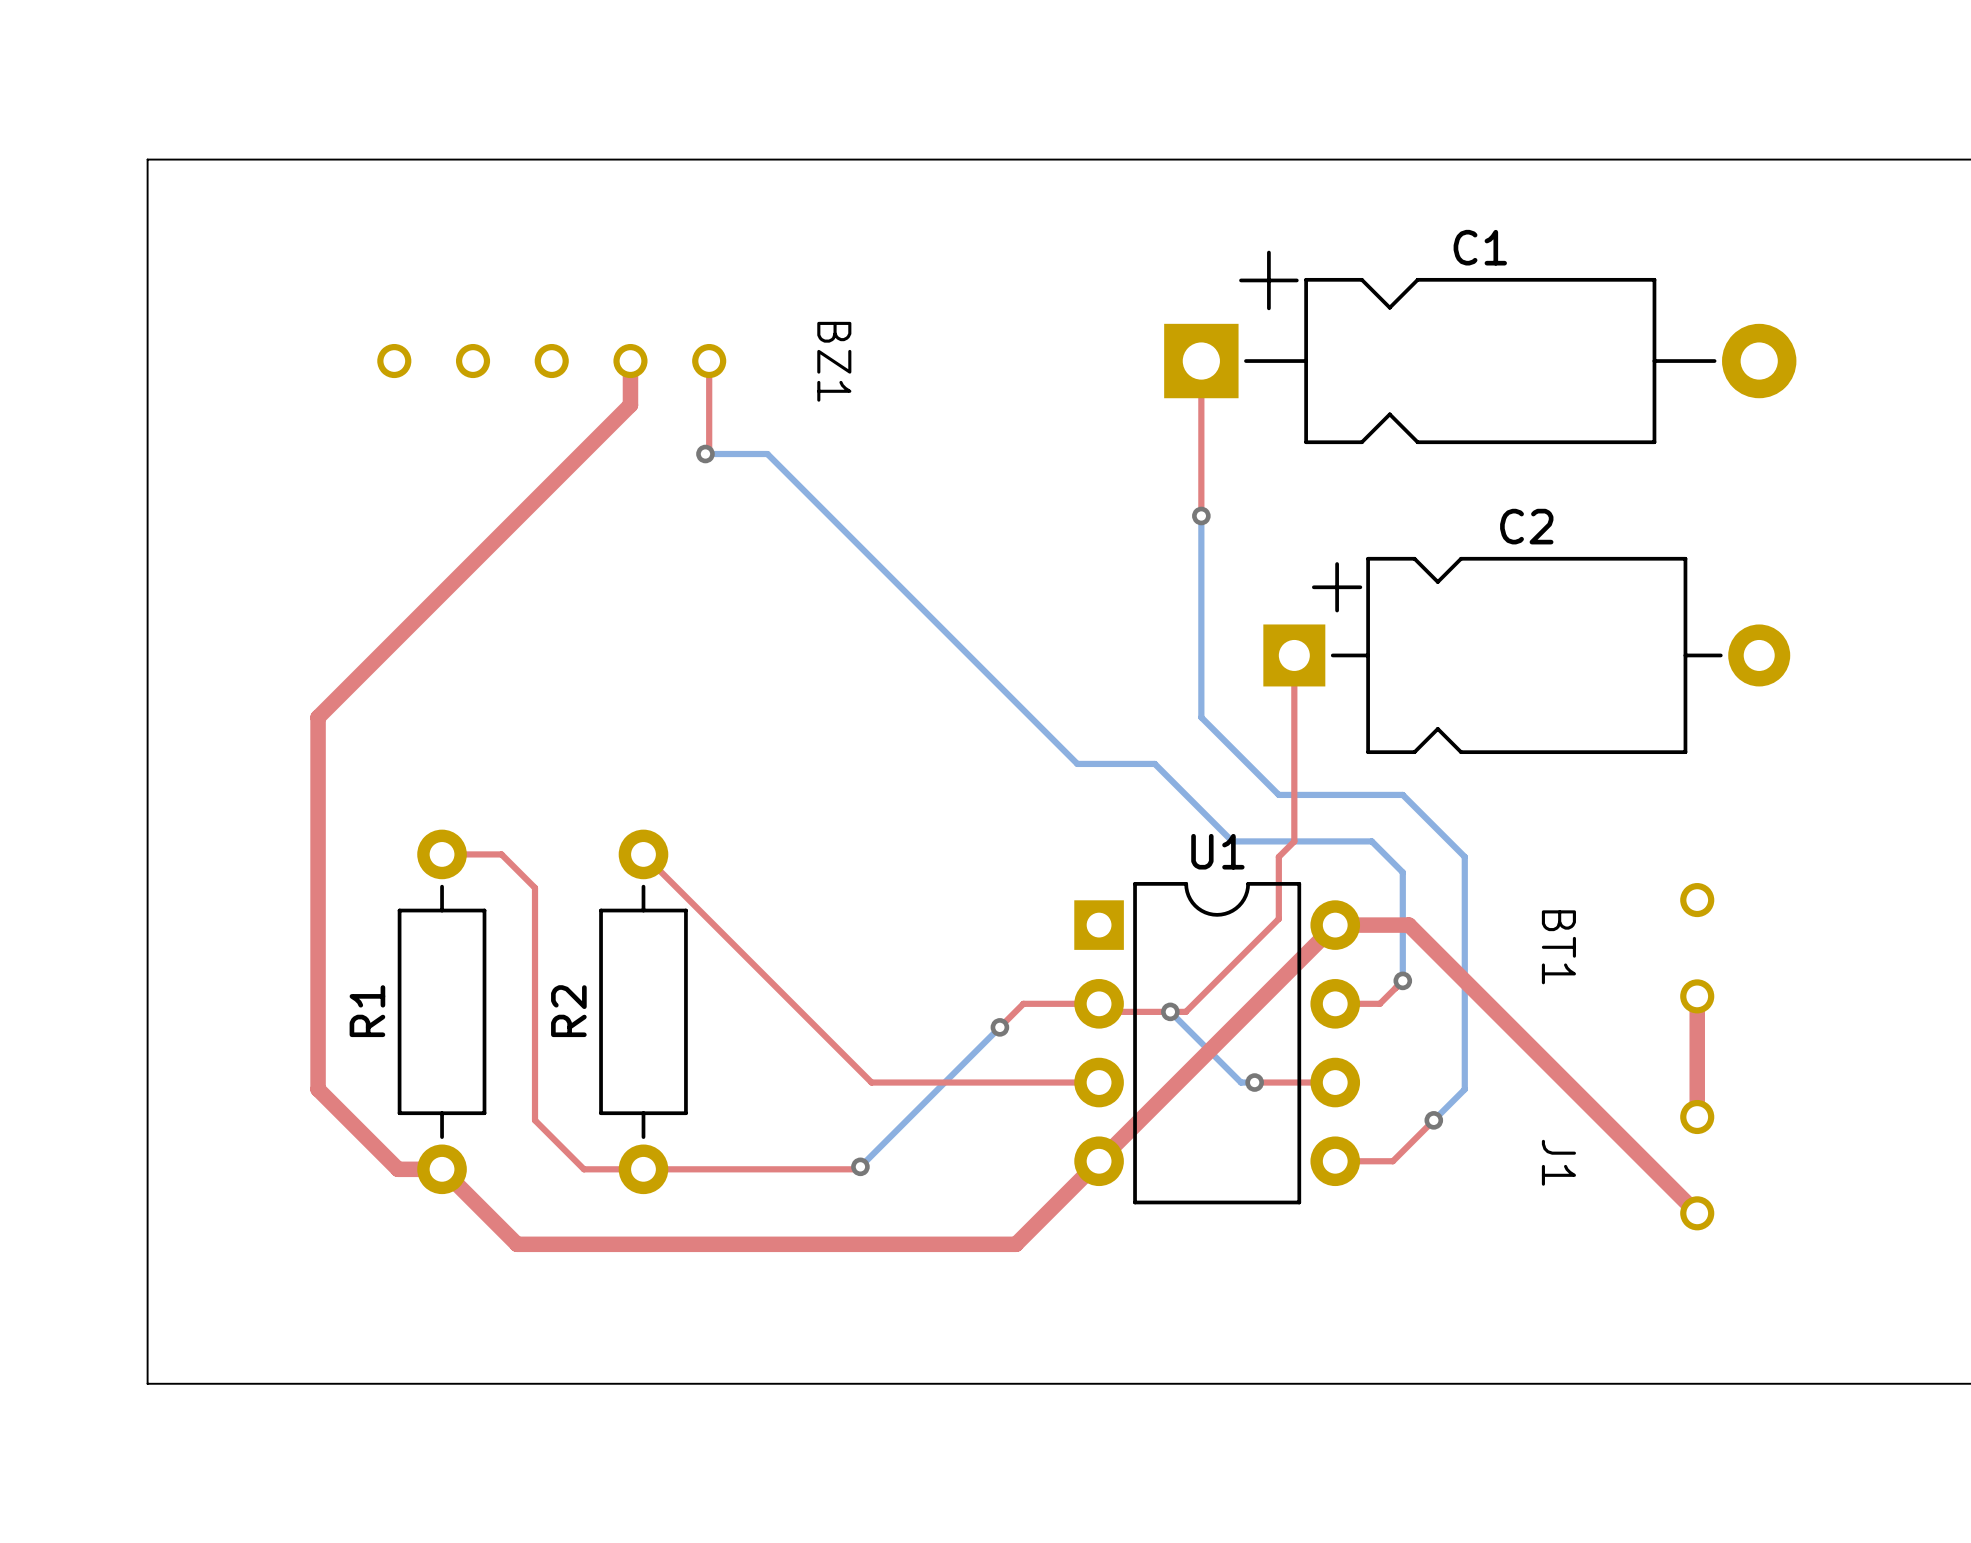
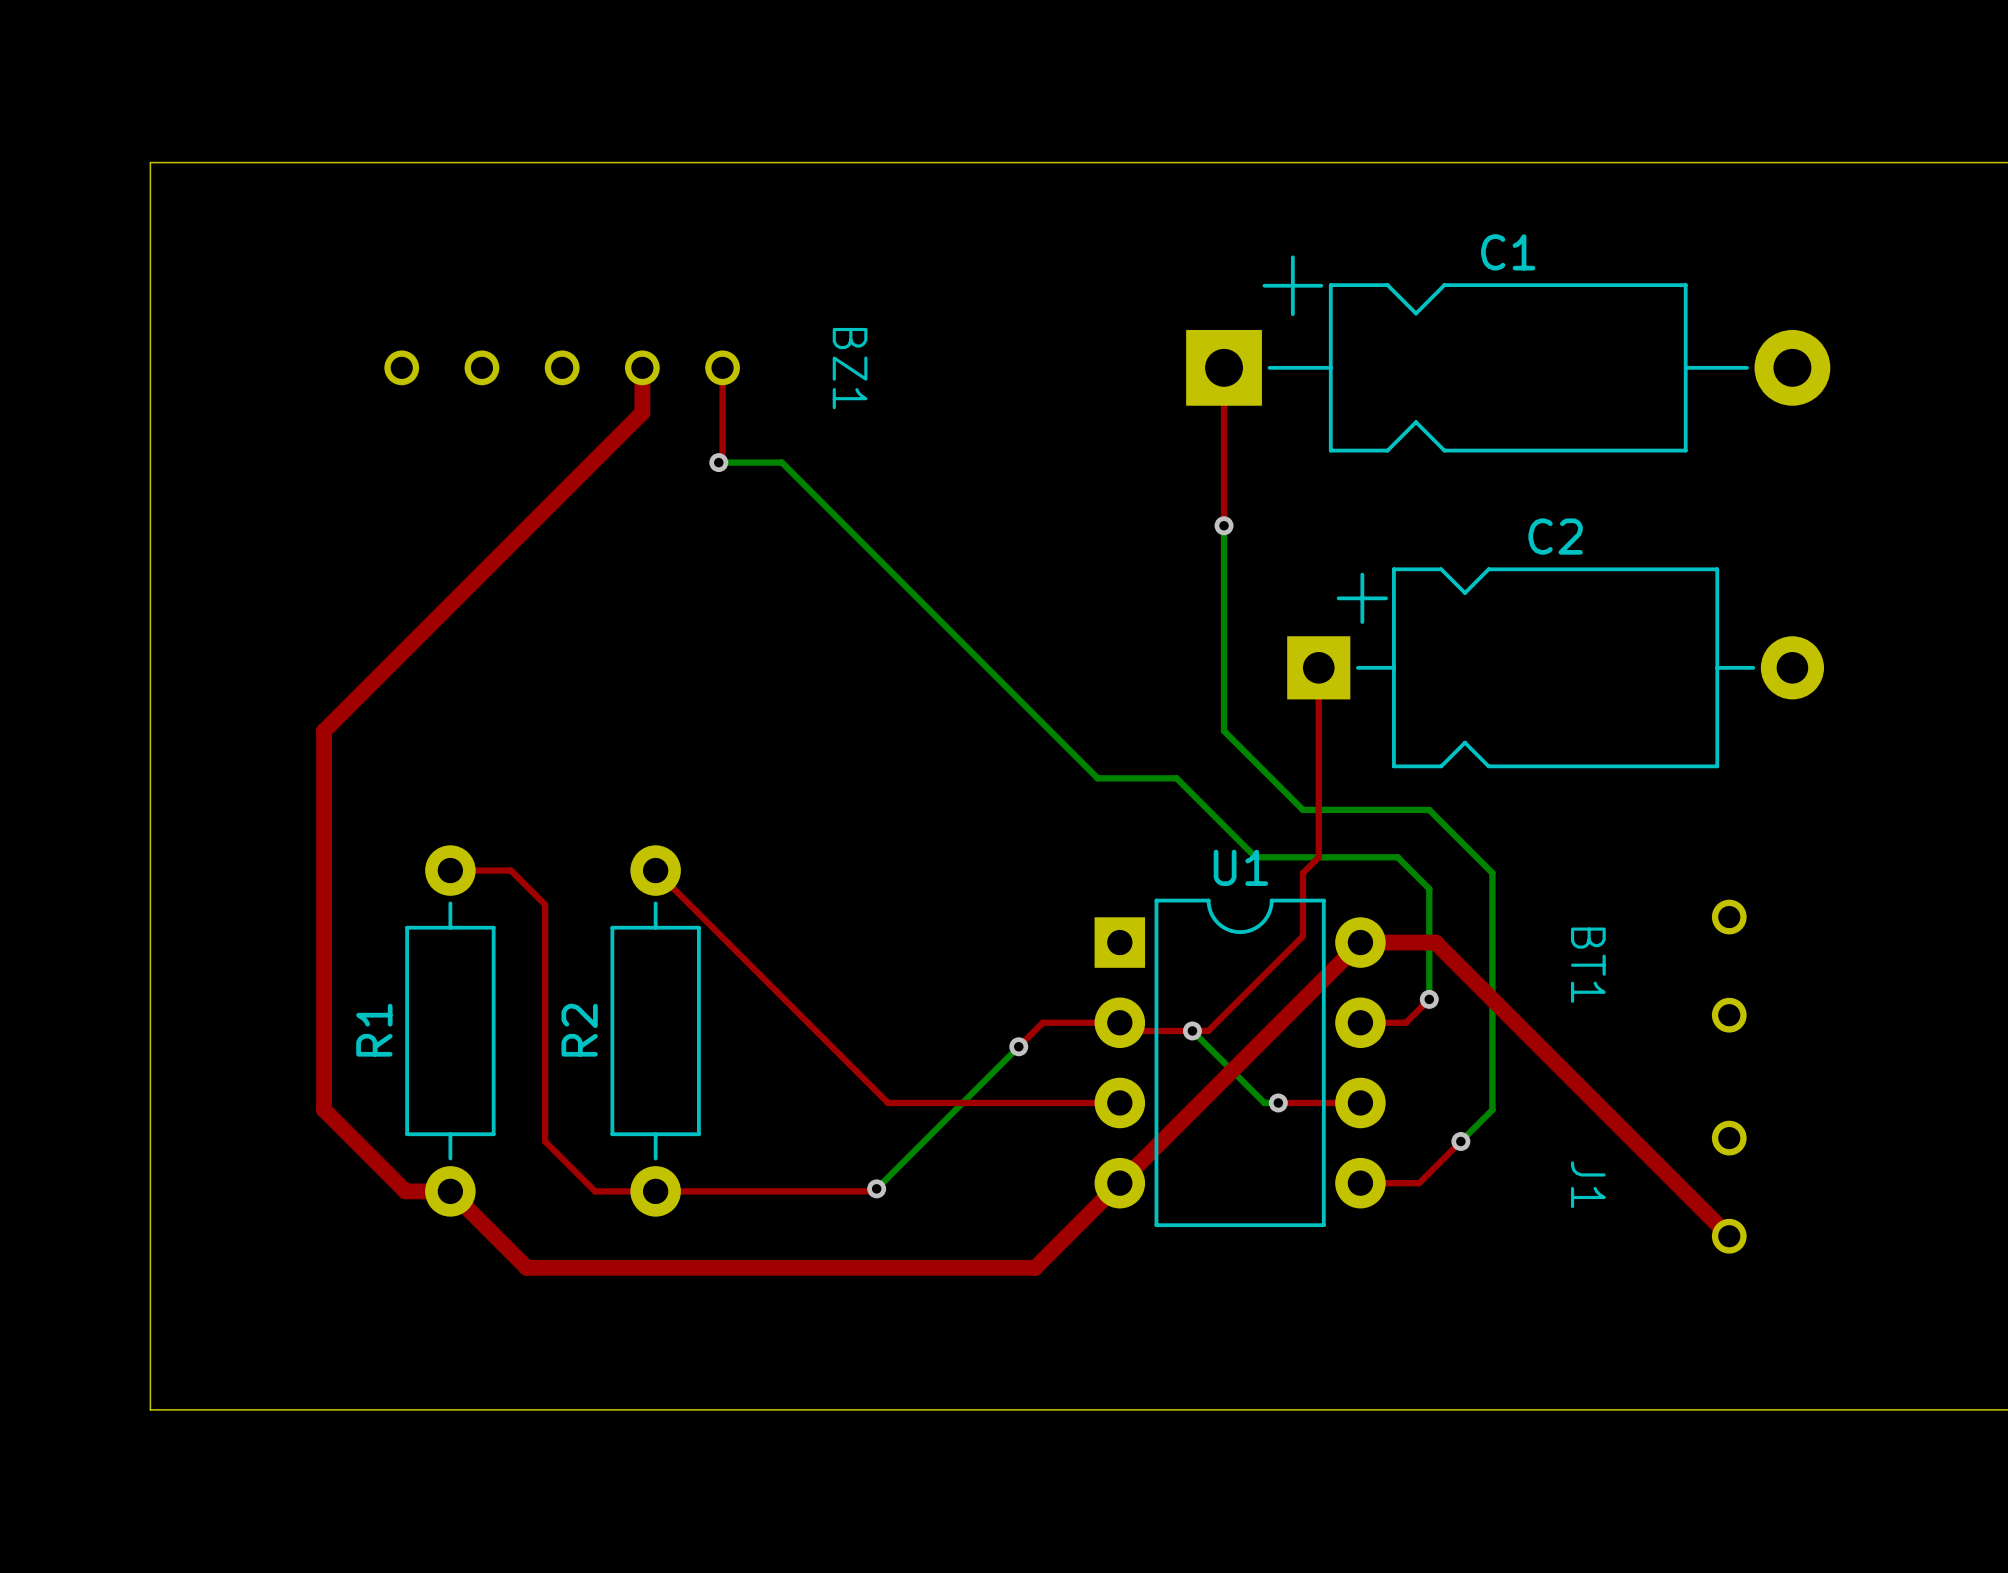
top track: (1697, 996) (1697, 1117) -> none

